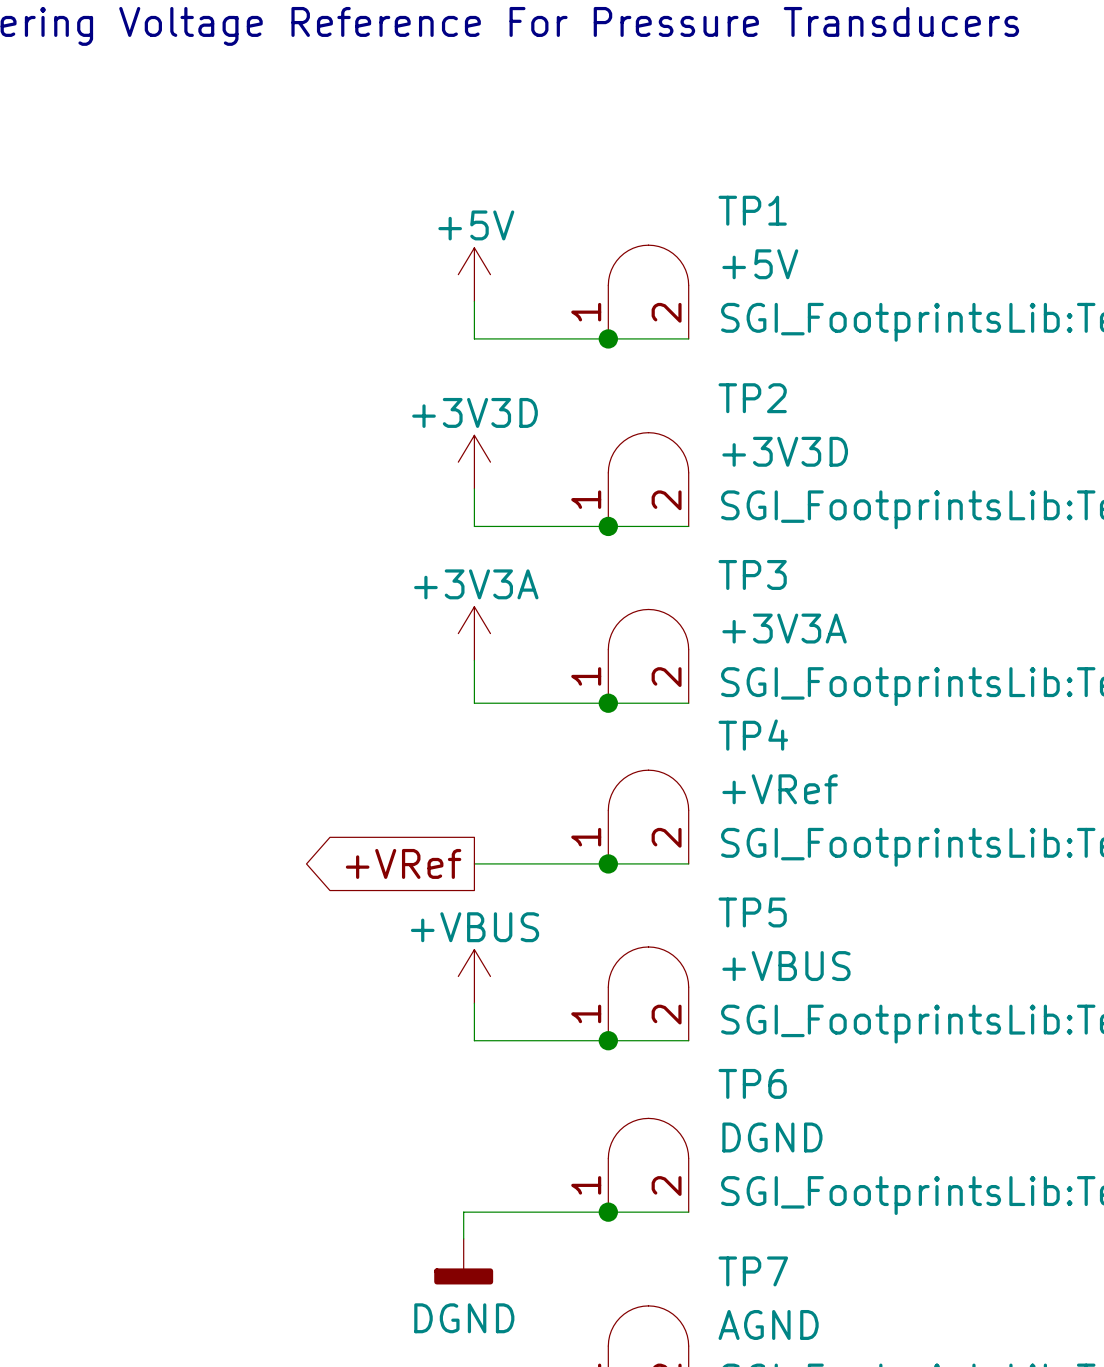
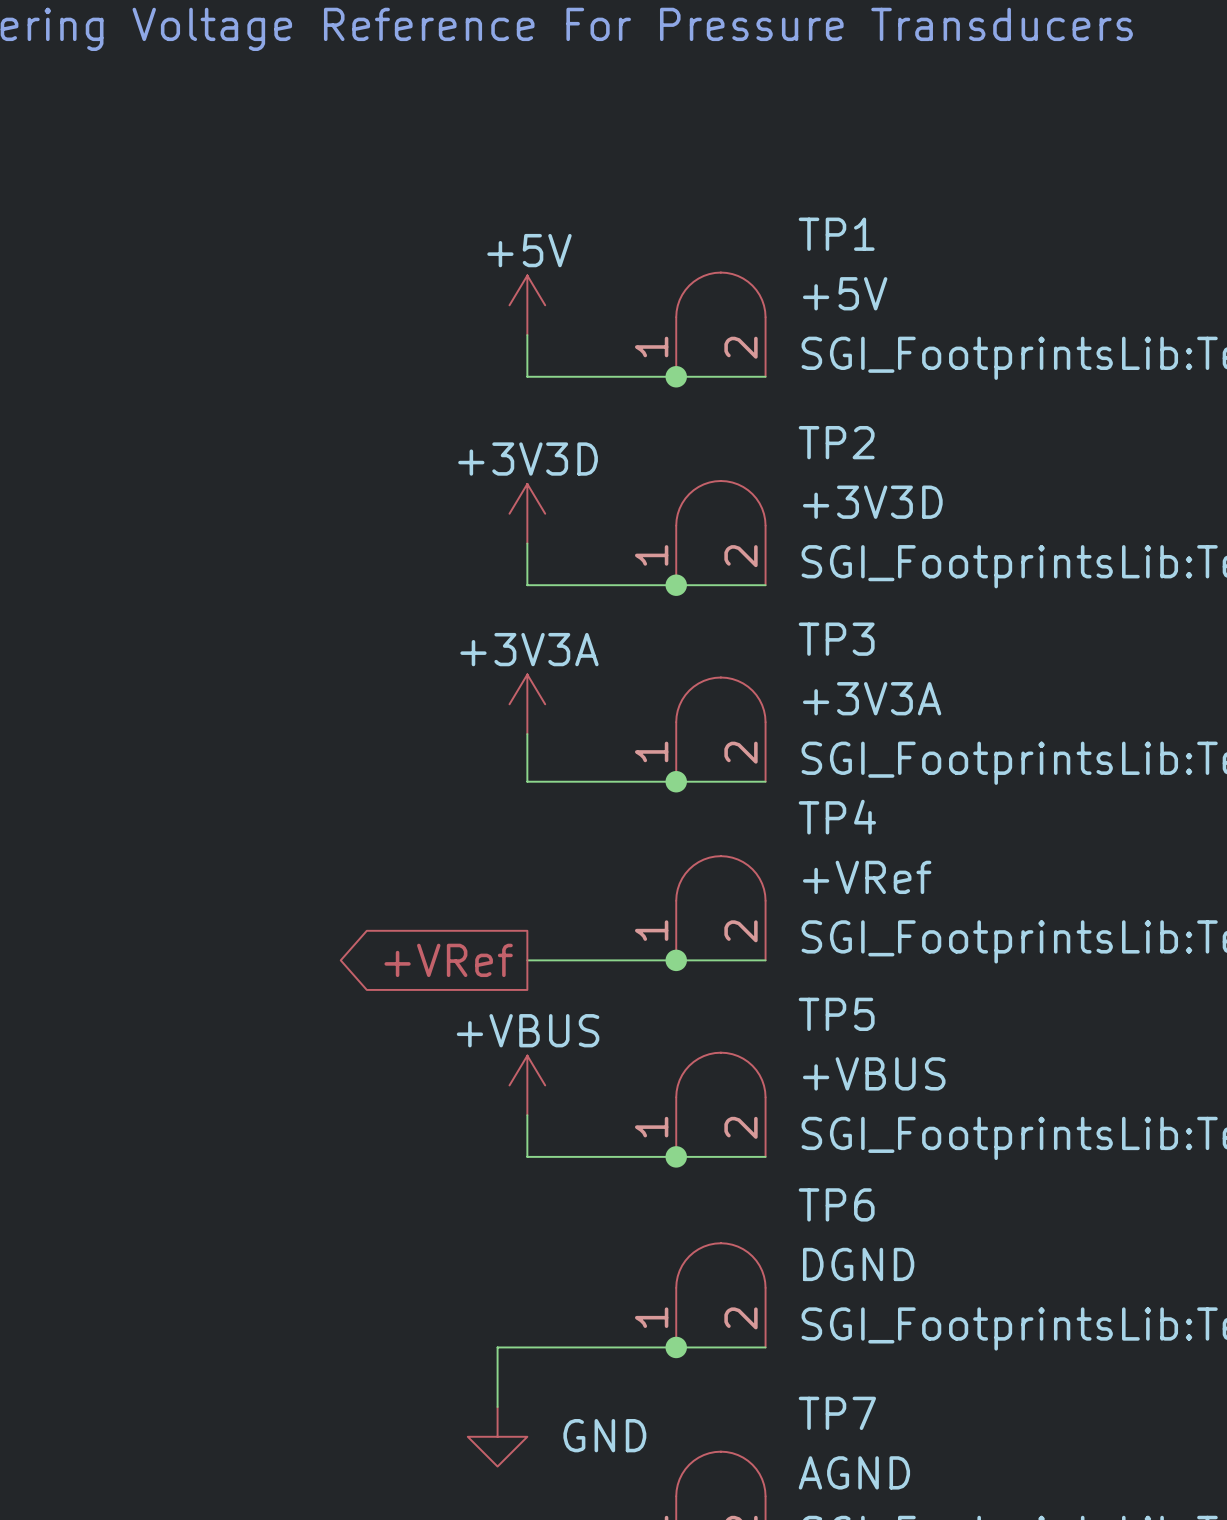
wire: (463, 1212) (463, 1238) -> (515, 1347) (497, 1347) (497, 1407)
power symbol: DGND (463, 1261) -> none
power symbol: none -> GND (497, 1436)

